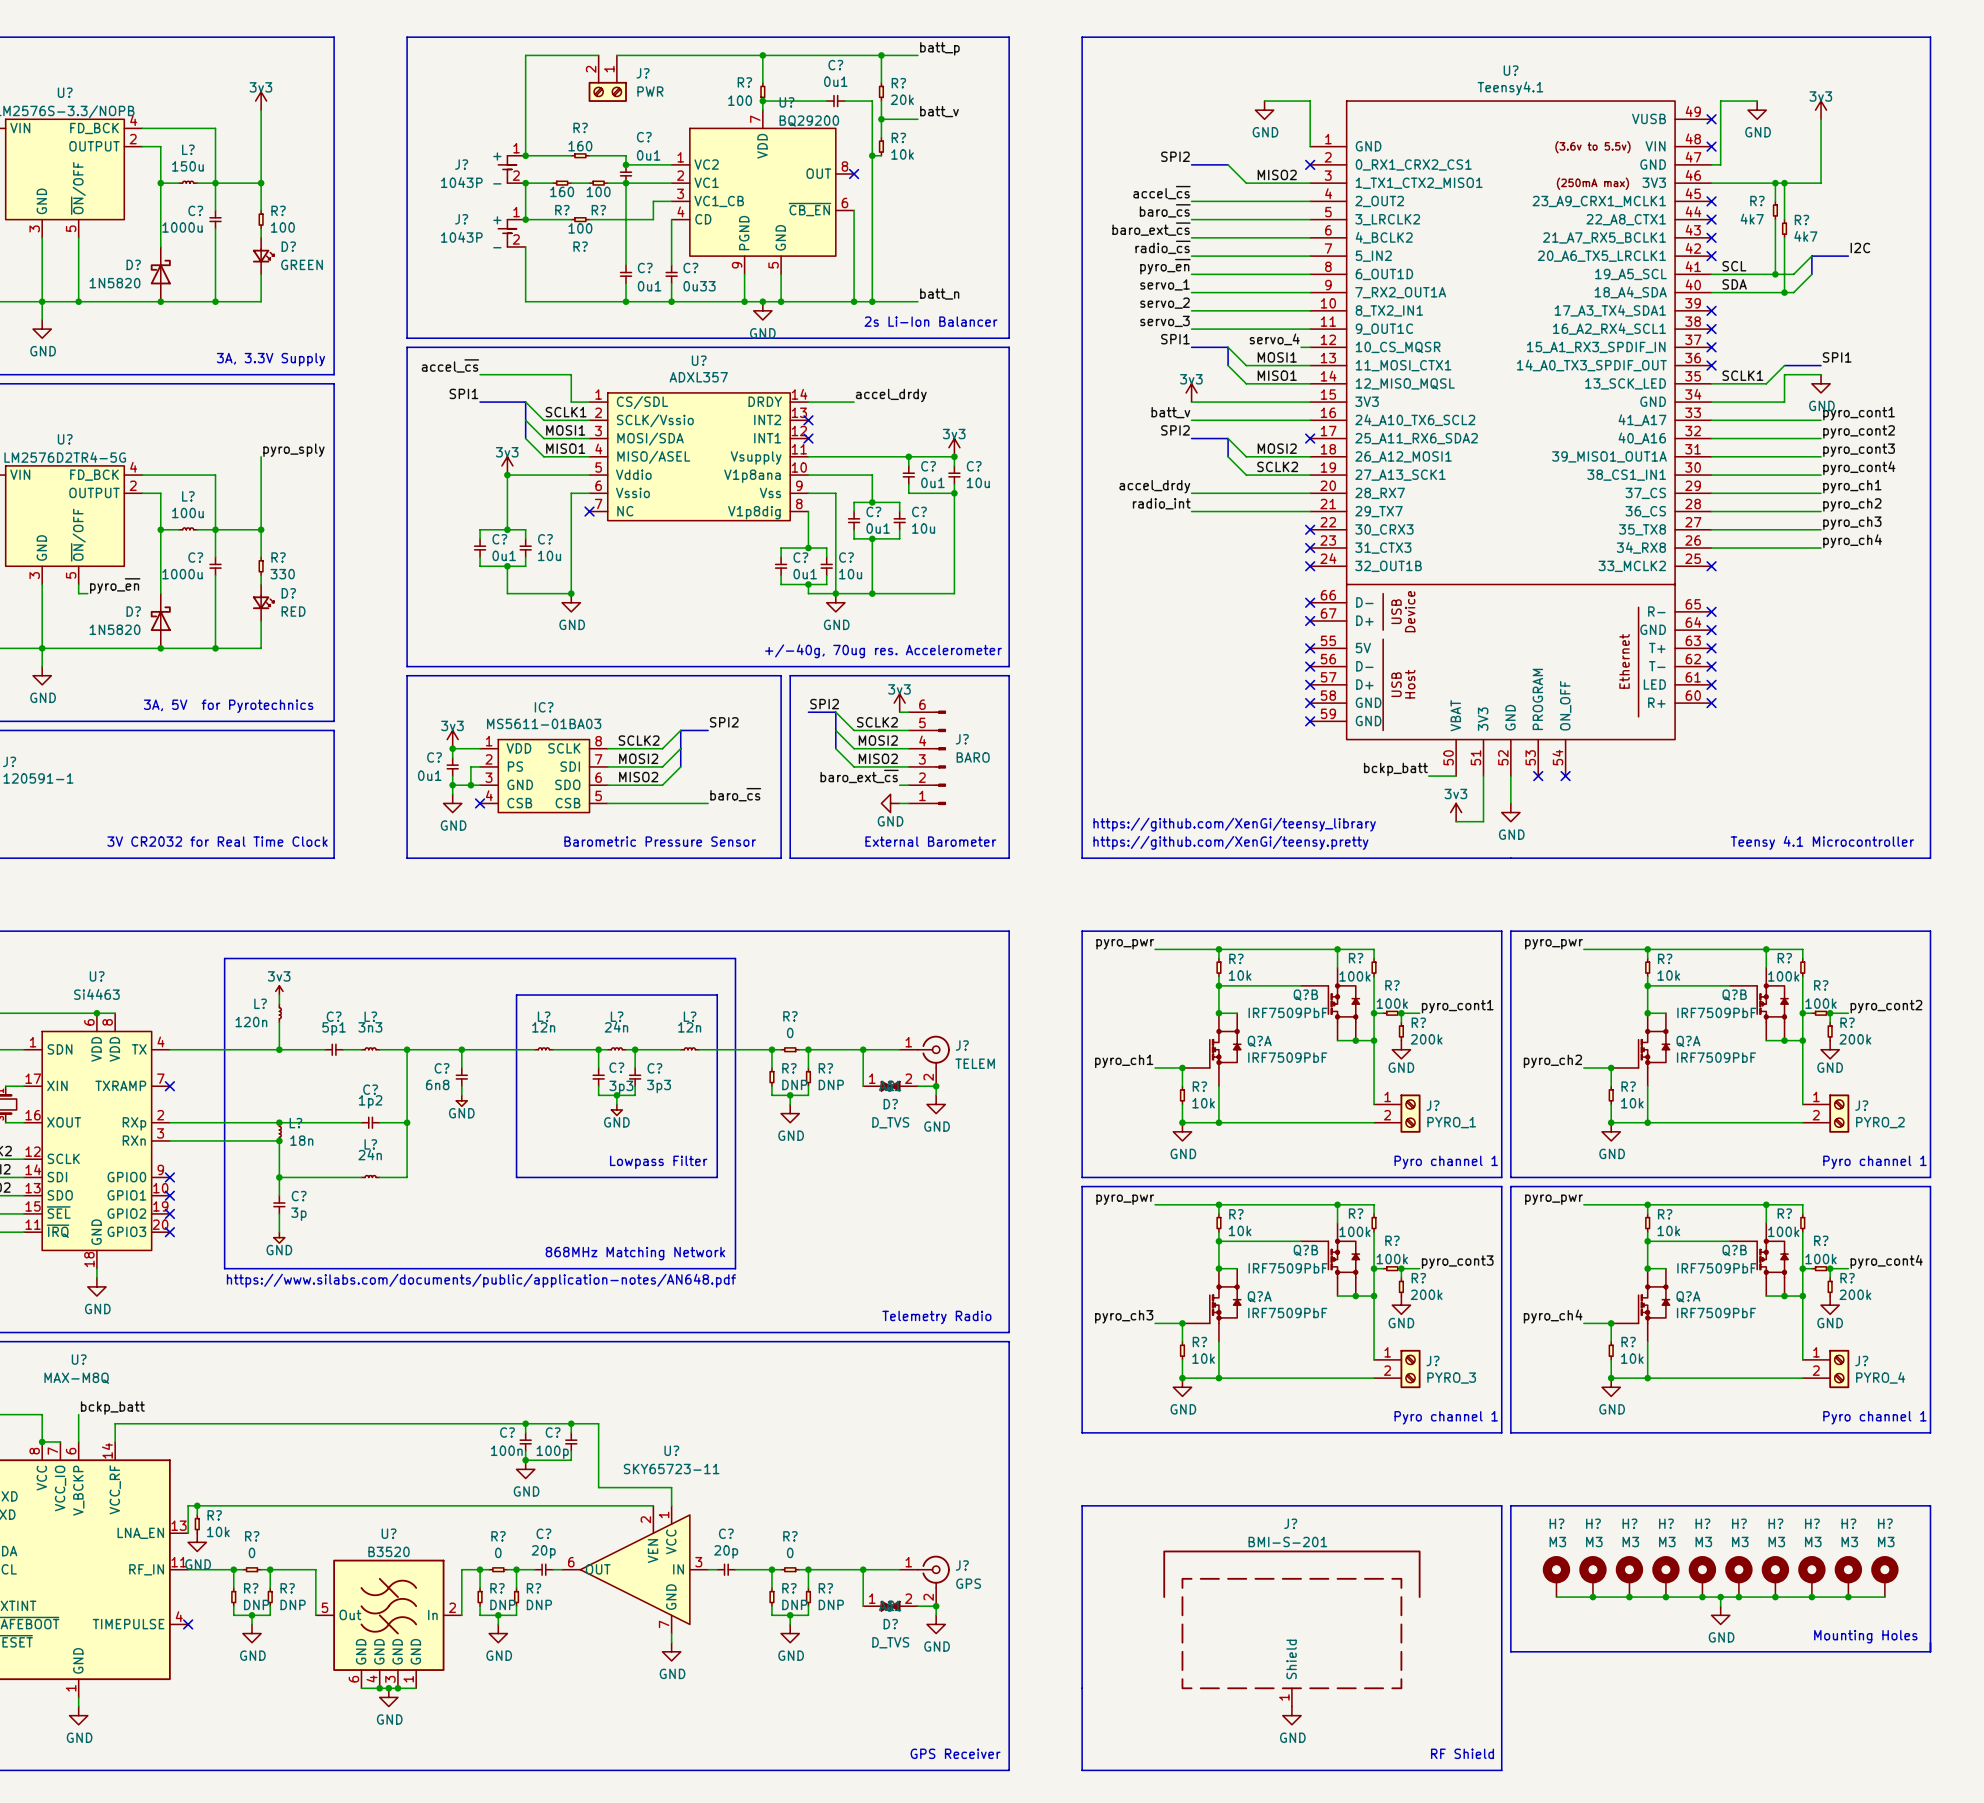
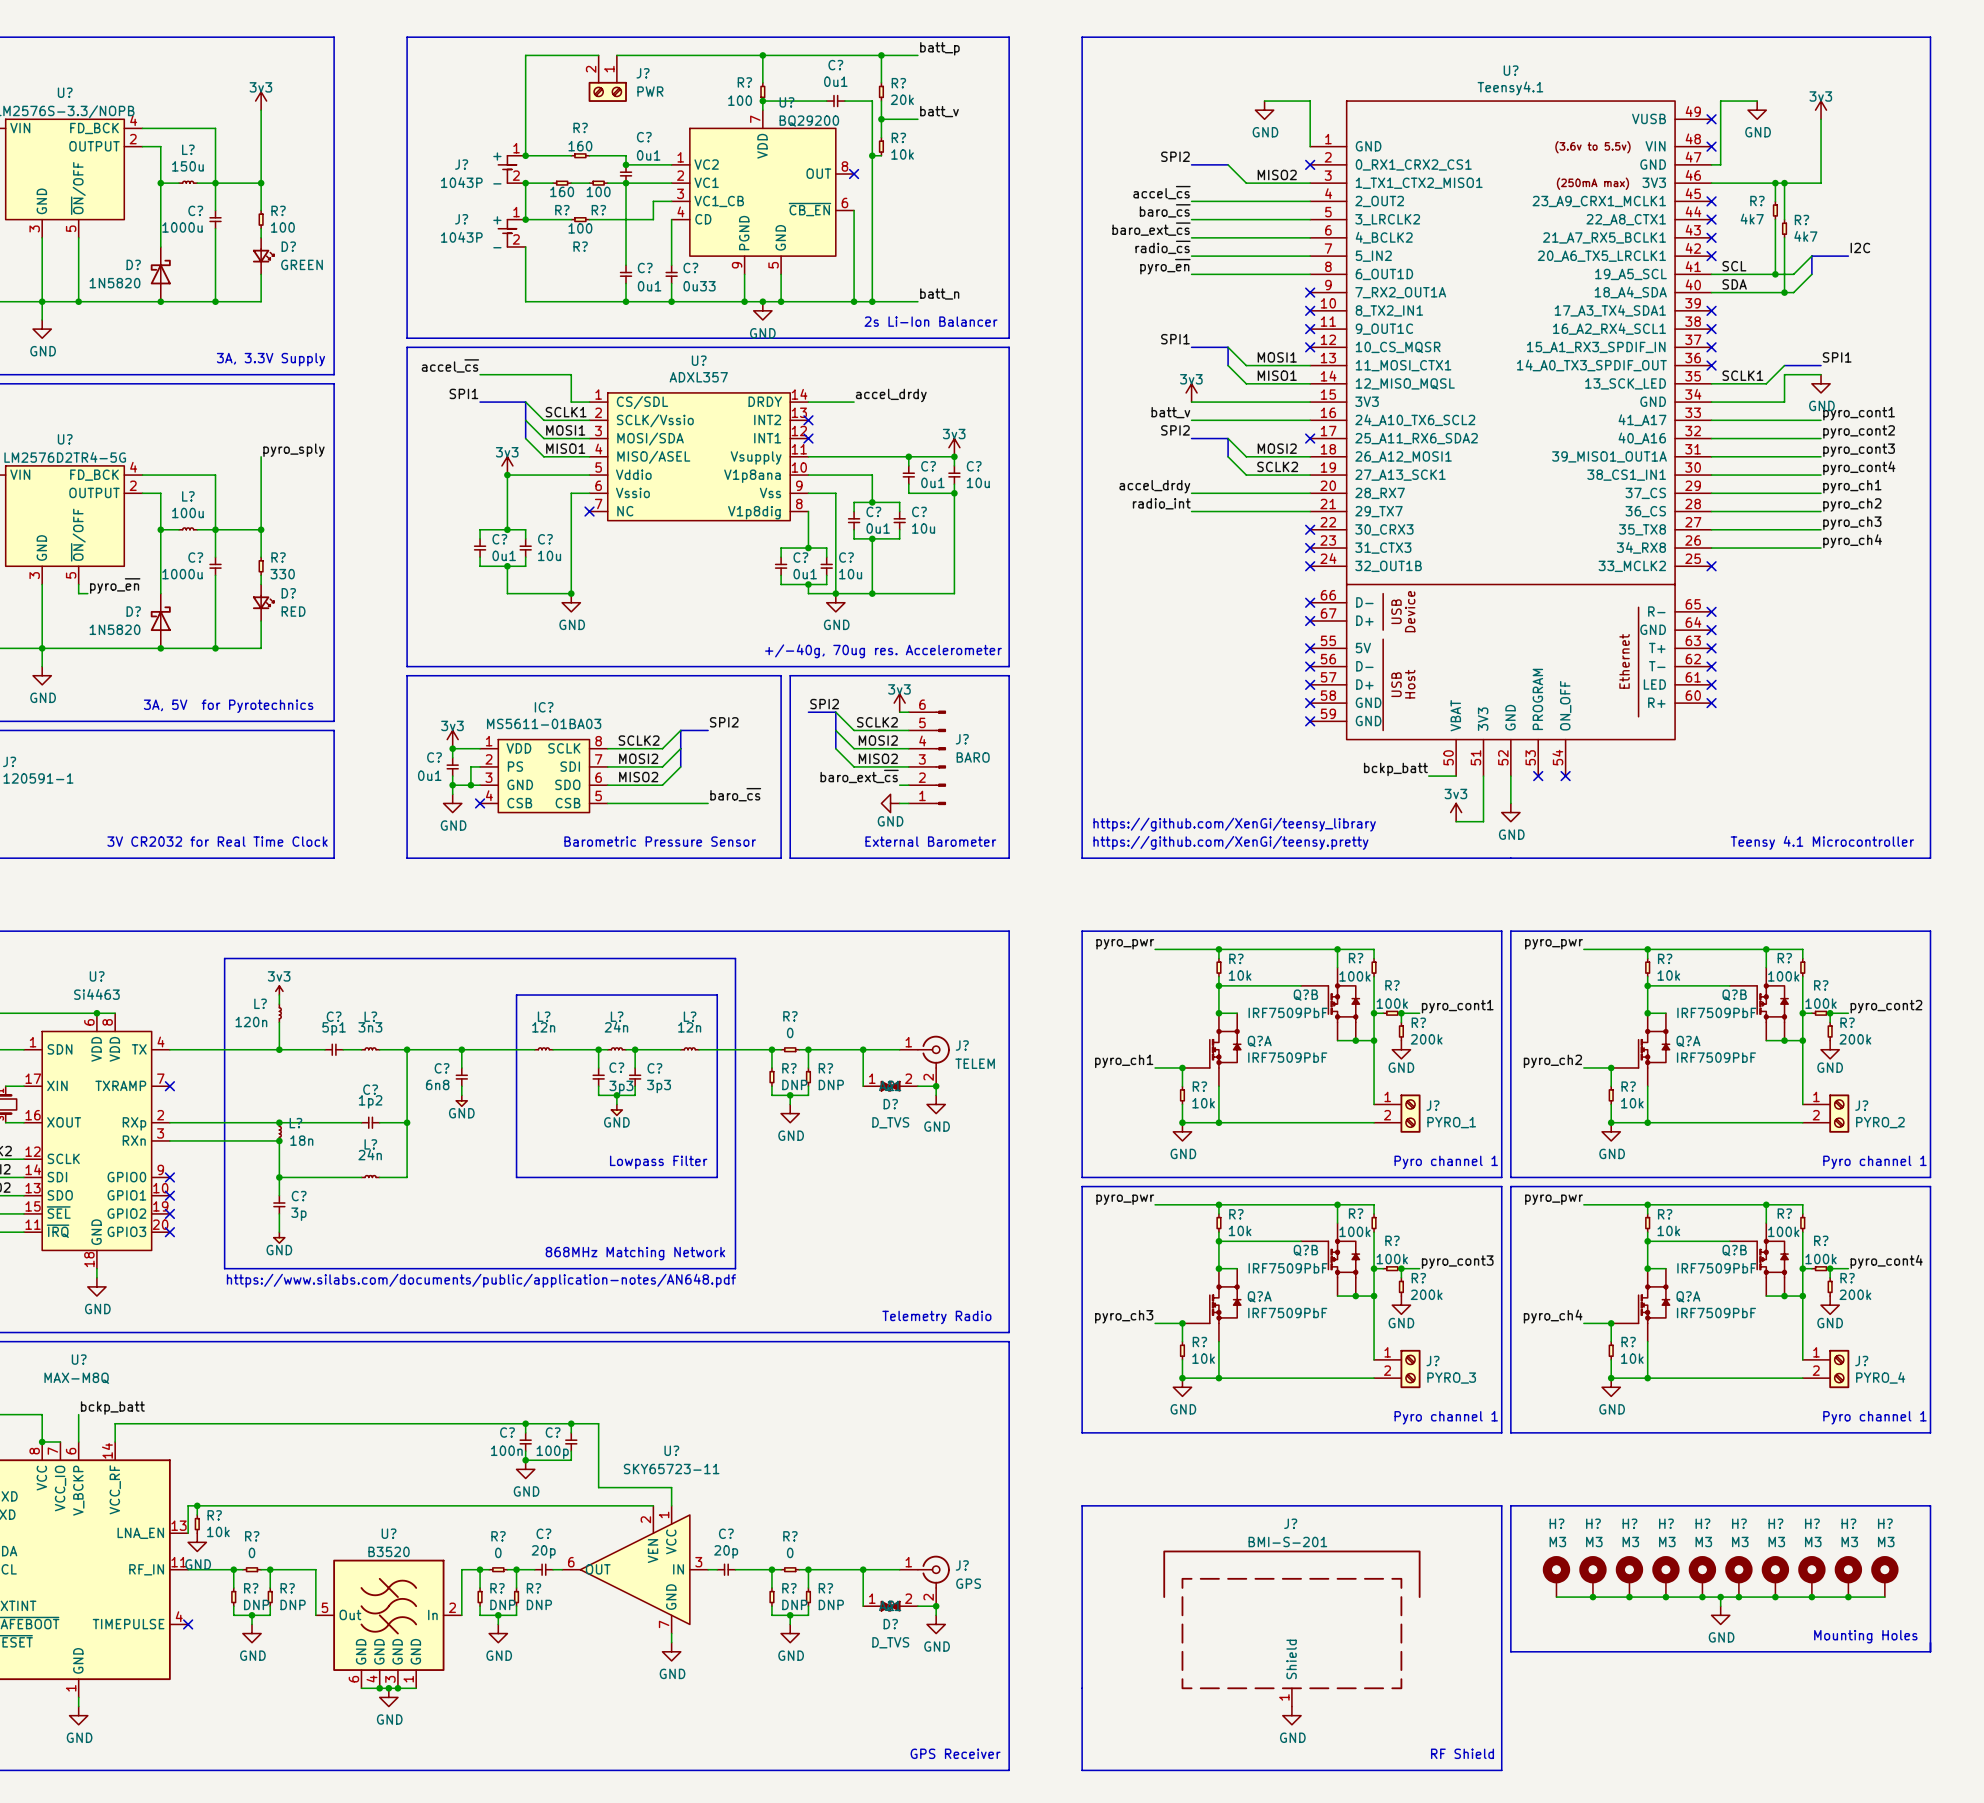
label: servo_1 (1165, 284) -> none
wire: (1191, 292) (1310, 292) -> none
no-connect mark: none -> (1310, 292)
label: servo_2 (1165, 303) -> none
wire: (1191, 310) (1310, 310) -> none
no-connect mark: none -> (1310, 310)
label: servo_3 (1165, 321) -> none
wire: (1191, 329) (1310, 329) -> none
no-connect mark: none -> (1310, 329)
label: servo_4 (1274, 339) -> none
wire: (1301, 347) (1310, 347) -> none
no-connect mark: none -> (1310, 347)

